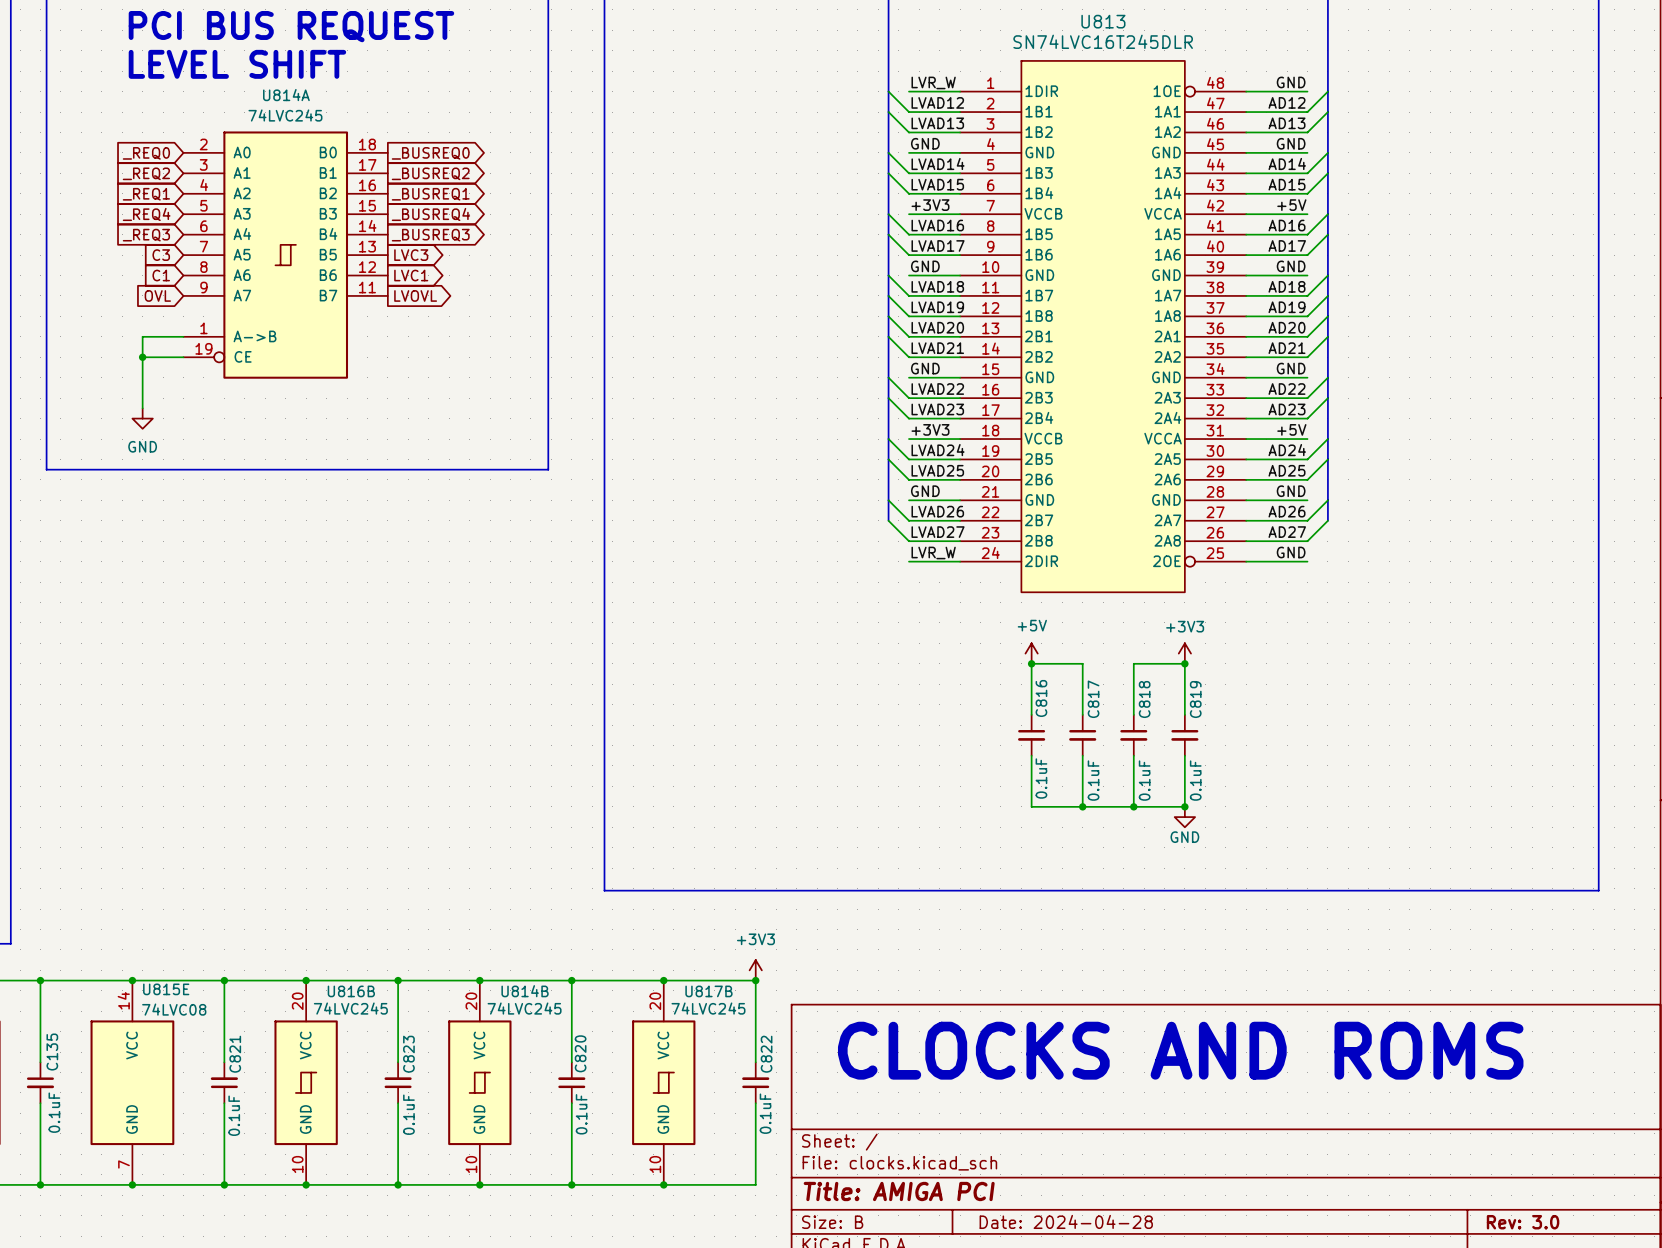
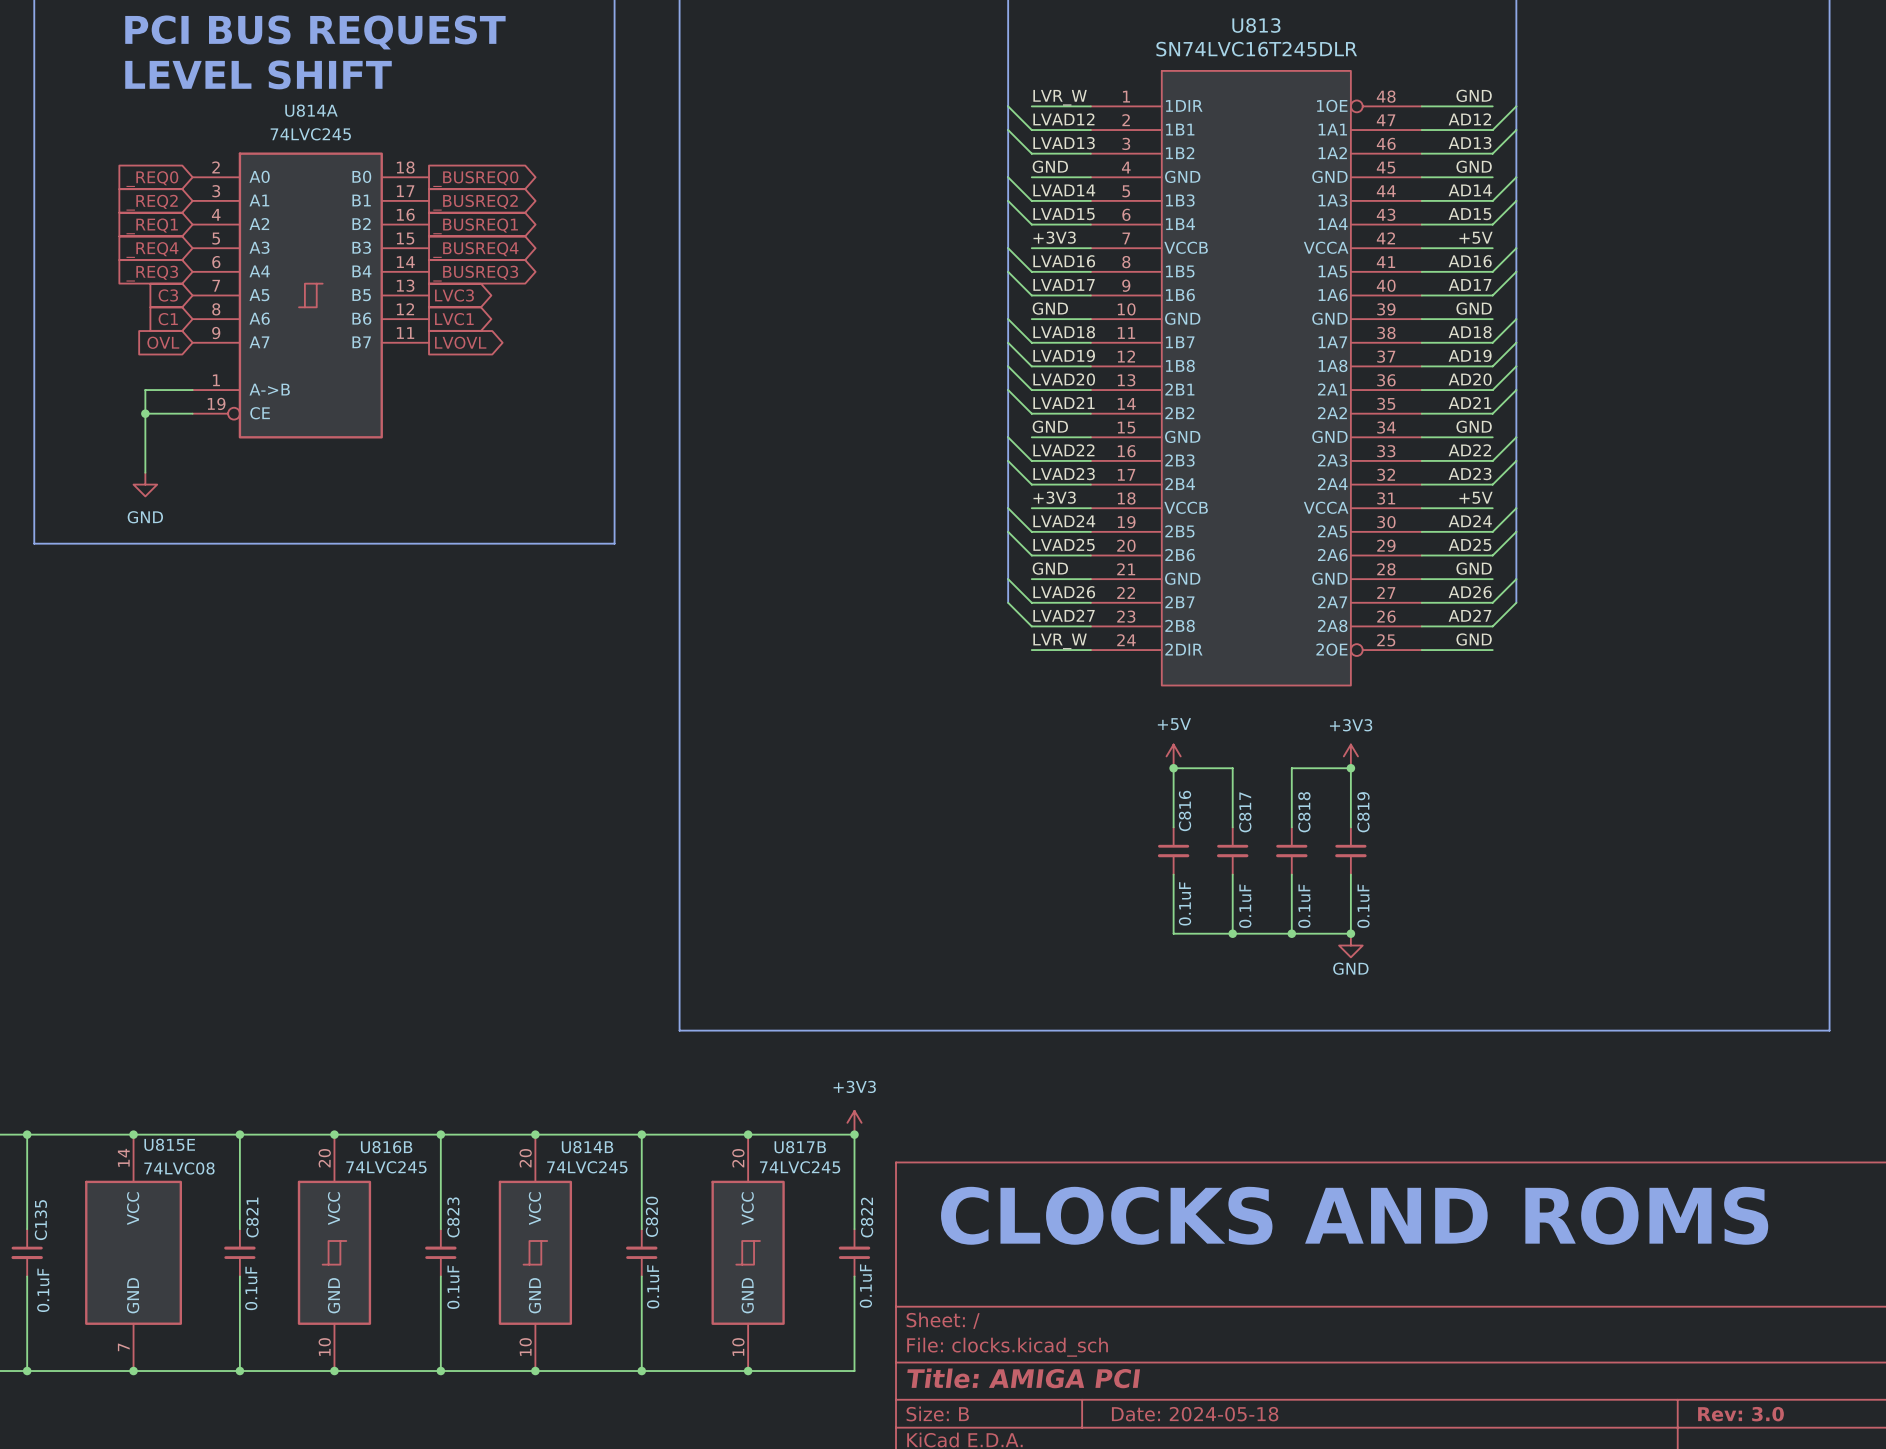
title block: Date: 2024-04-28 (1066, 1221) -> Date: 2024-05-18 (1195, 1414)

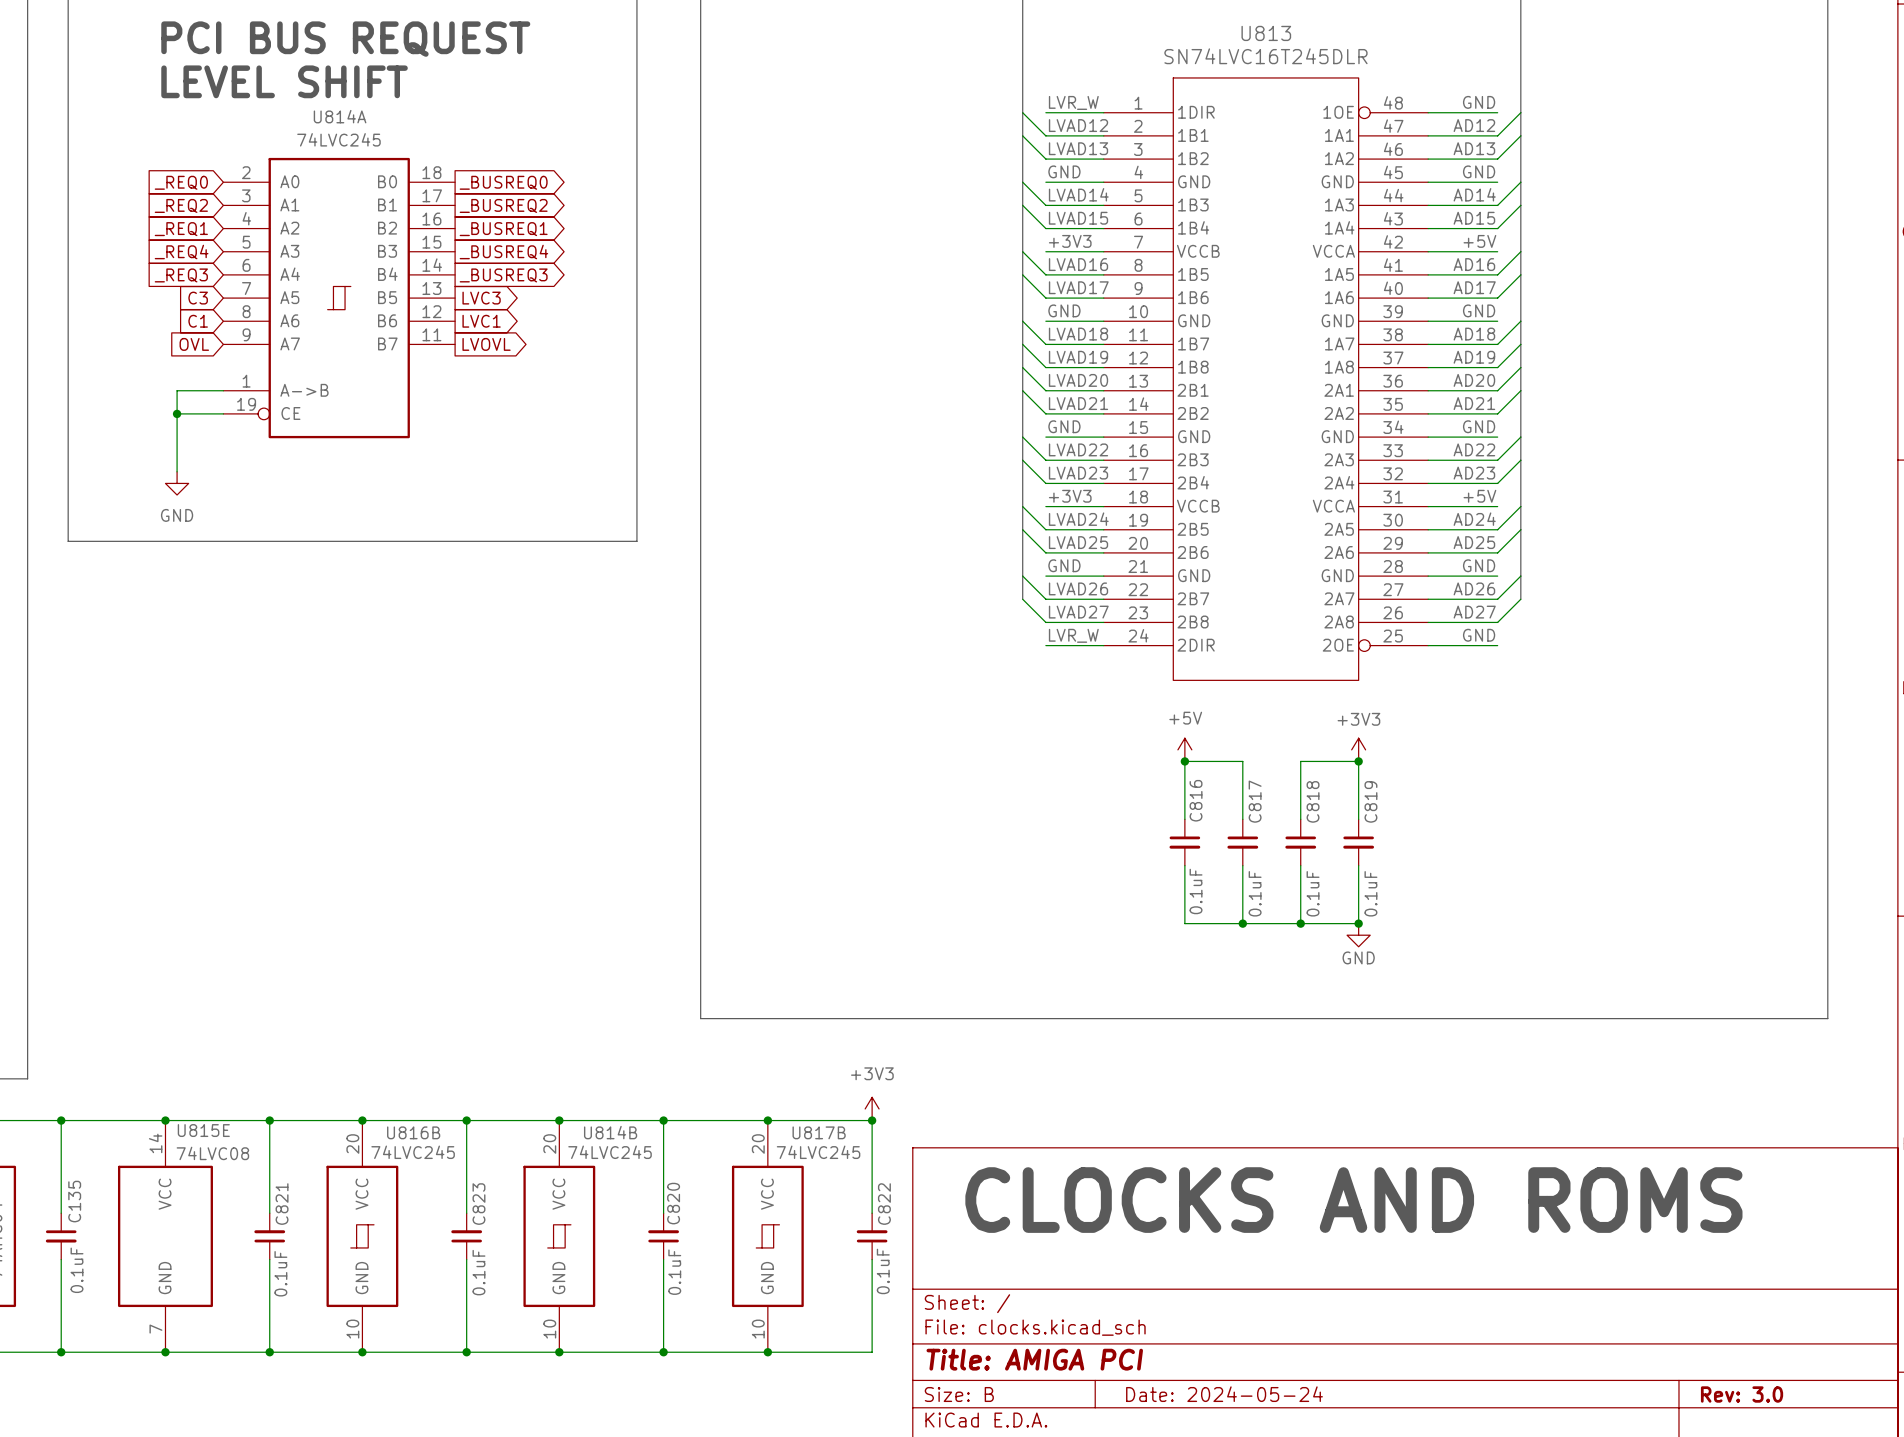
title block: Date: 2024-05-18 (1195, 1414) -> Date: 2024-05-24 (1224, 1394)

